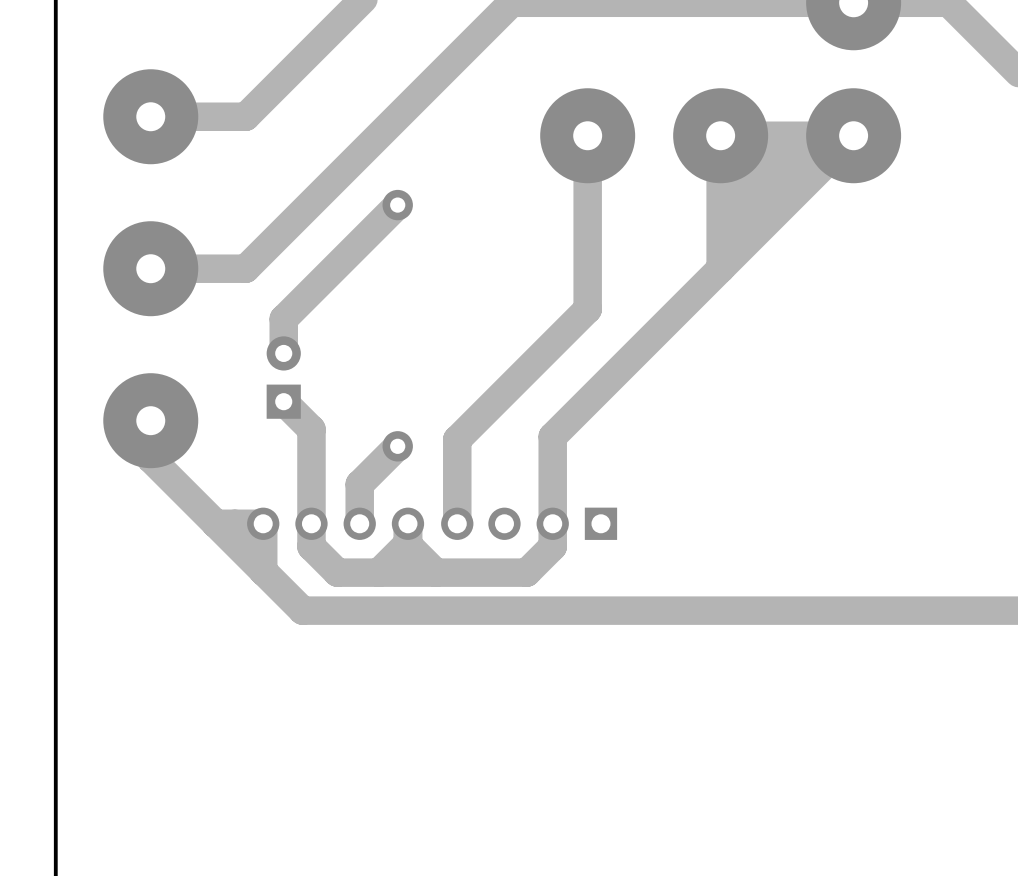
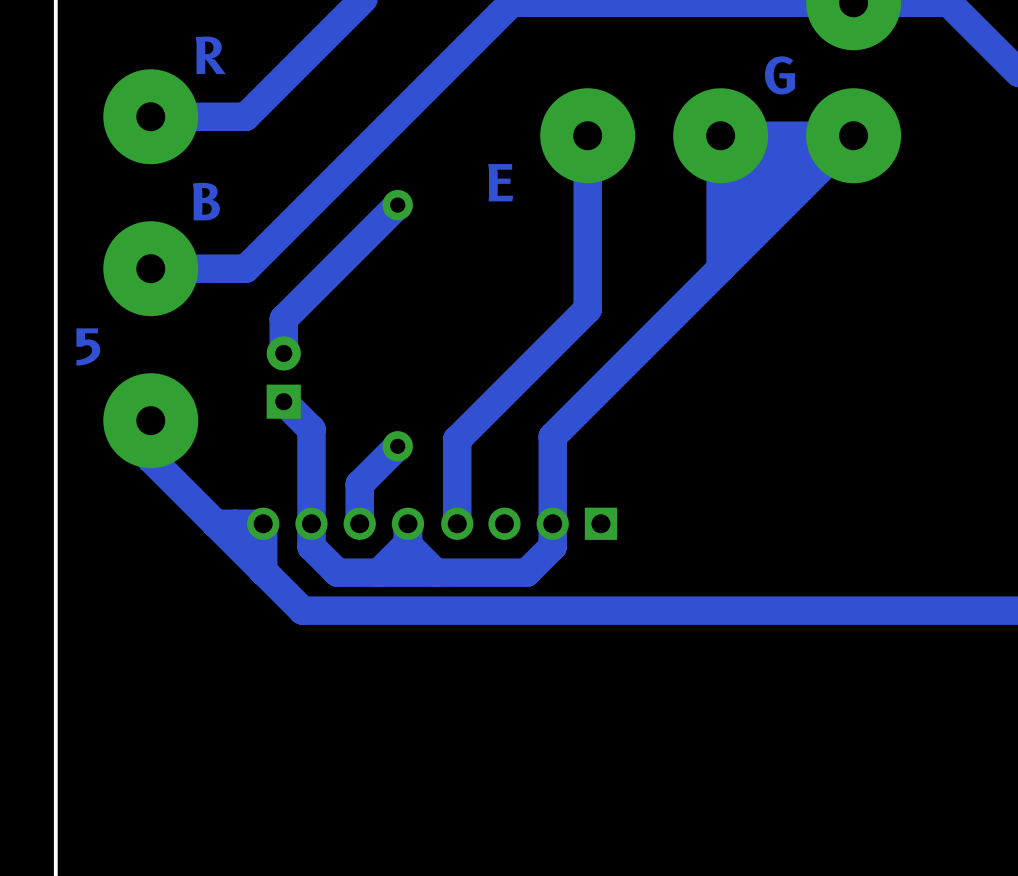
text: none -> R (210, 55)
text: none -> G (779, 75)
text: none -> E (500, 182)
text: none -> B (206, 201)
text: none -> 5 (88, 347)

